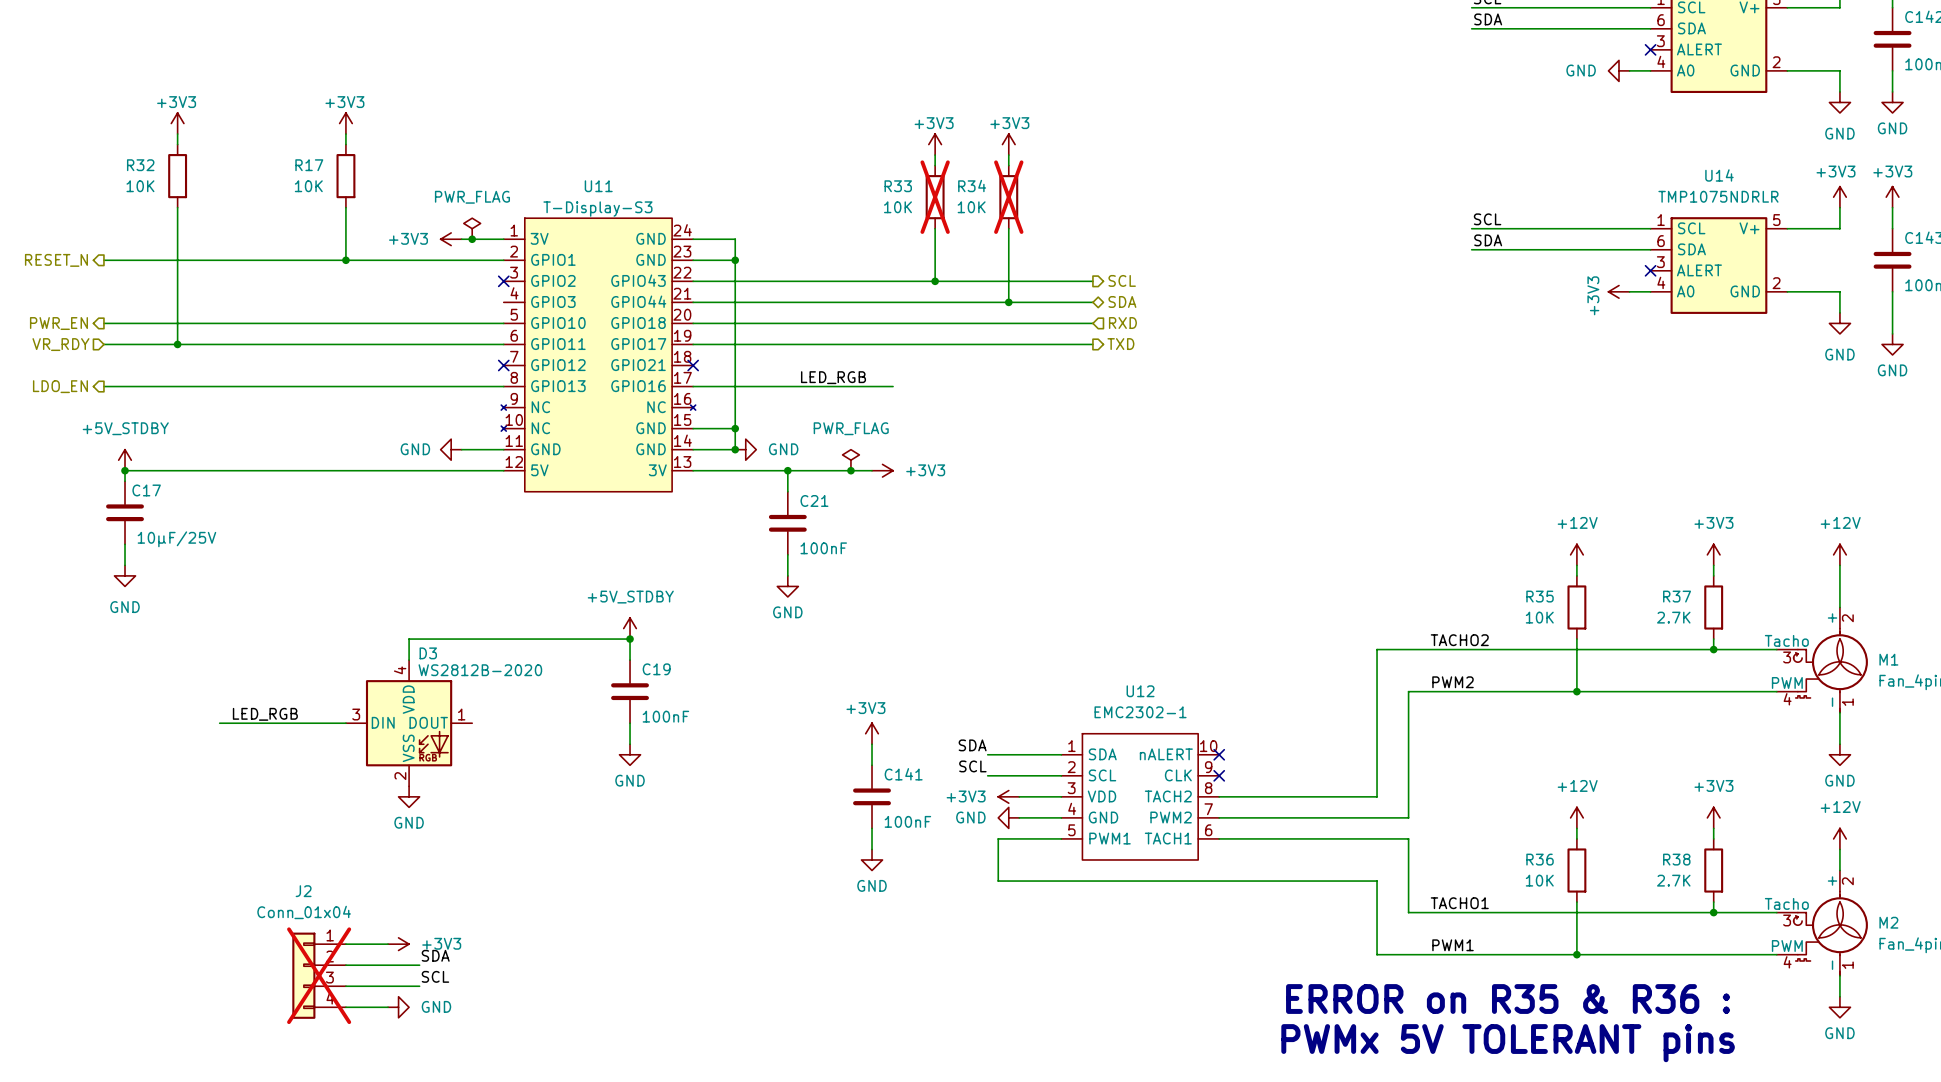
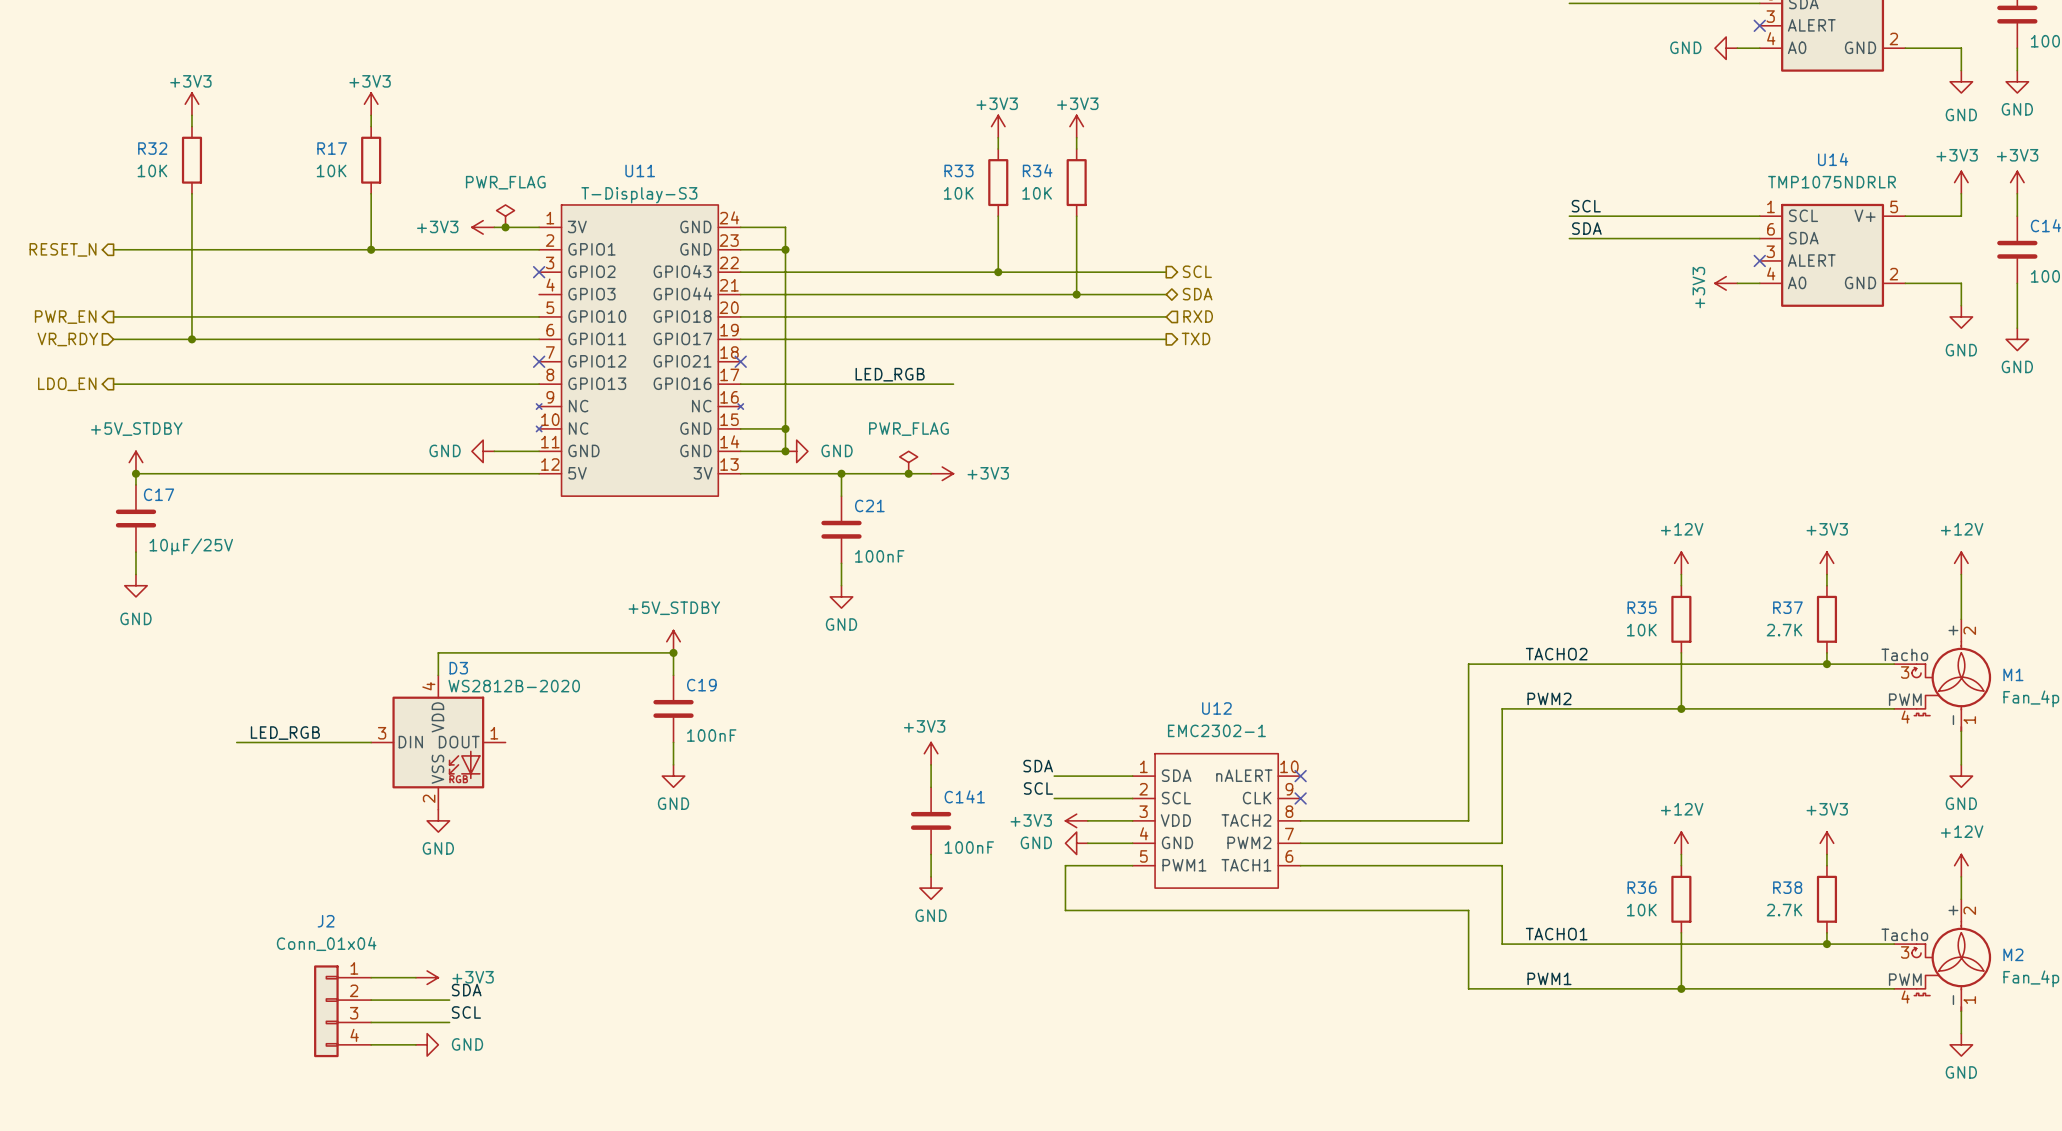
R33 do-not-place cross: (935, 197) -> none
R34 do-not-place cross: (1008, 197) -> none
J2 do-not-place cross: (319, 975) -> none
text: ERROR on R35 & R36 : (1508, 999) -> none
text: PWMx 5V TOLERANT pins (1508, 1043) -> none

